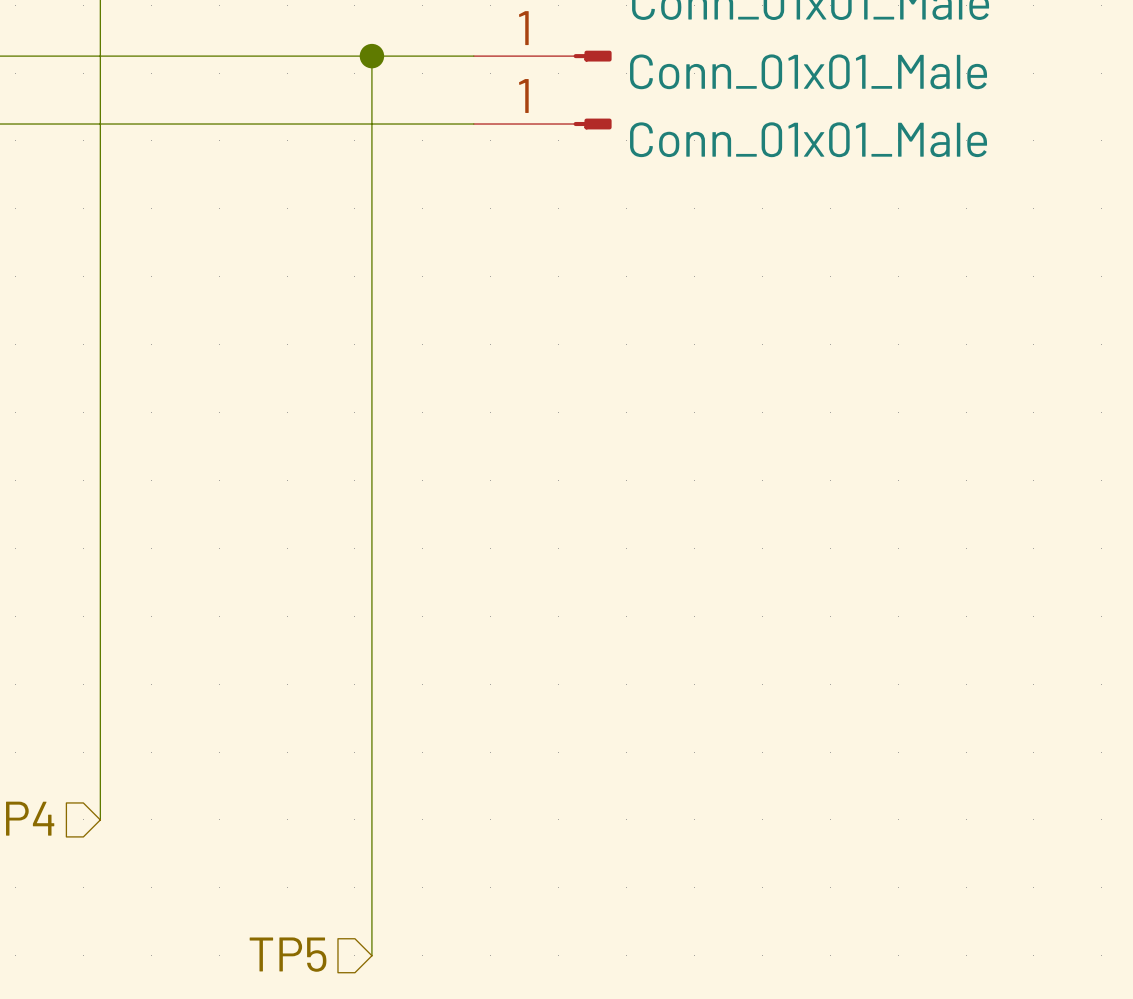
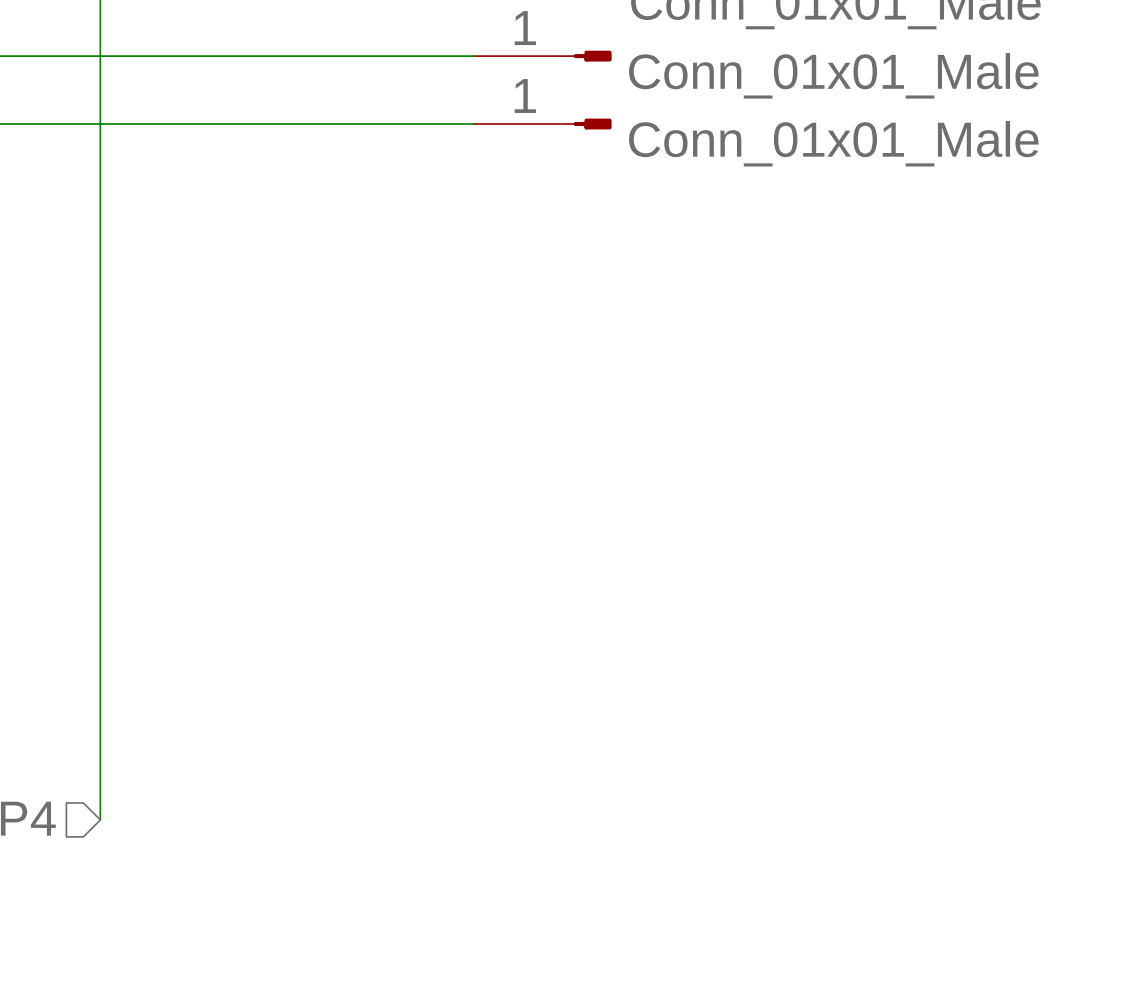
wire: (371, 56) (371, 955) -> none
junction: (371, 56) -> none
hierarchical label: TP5 (288, 954) -> none

